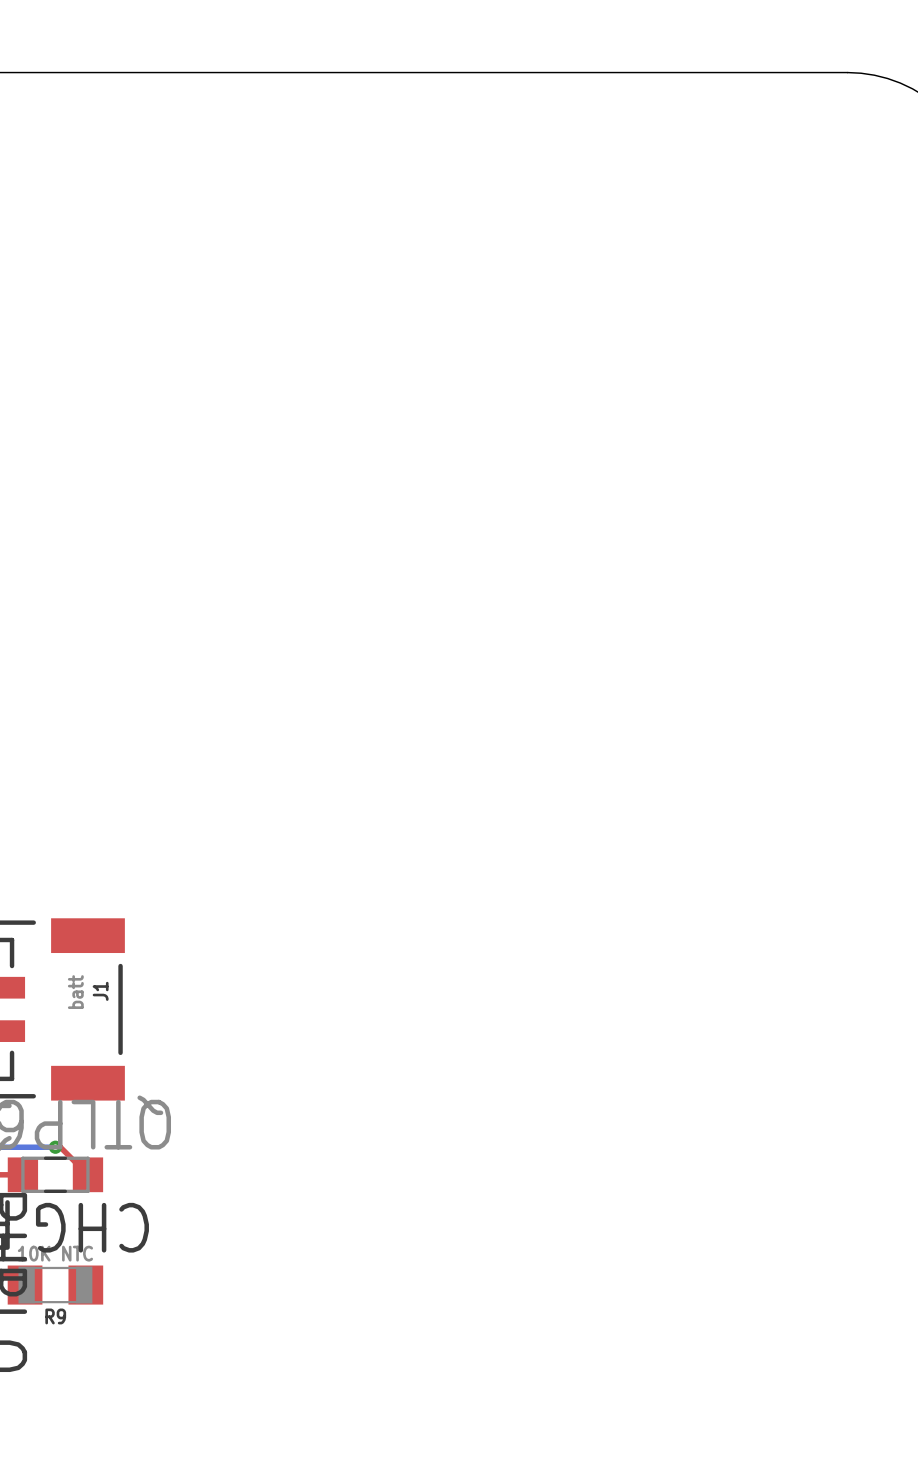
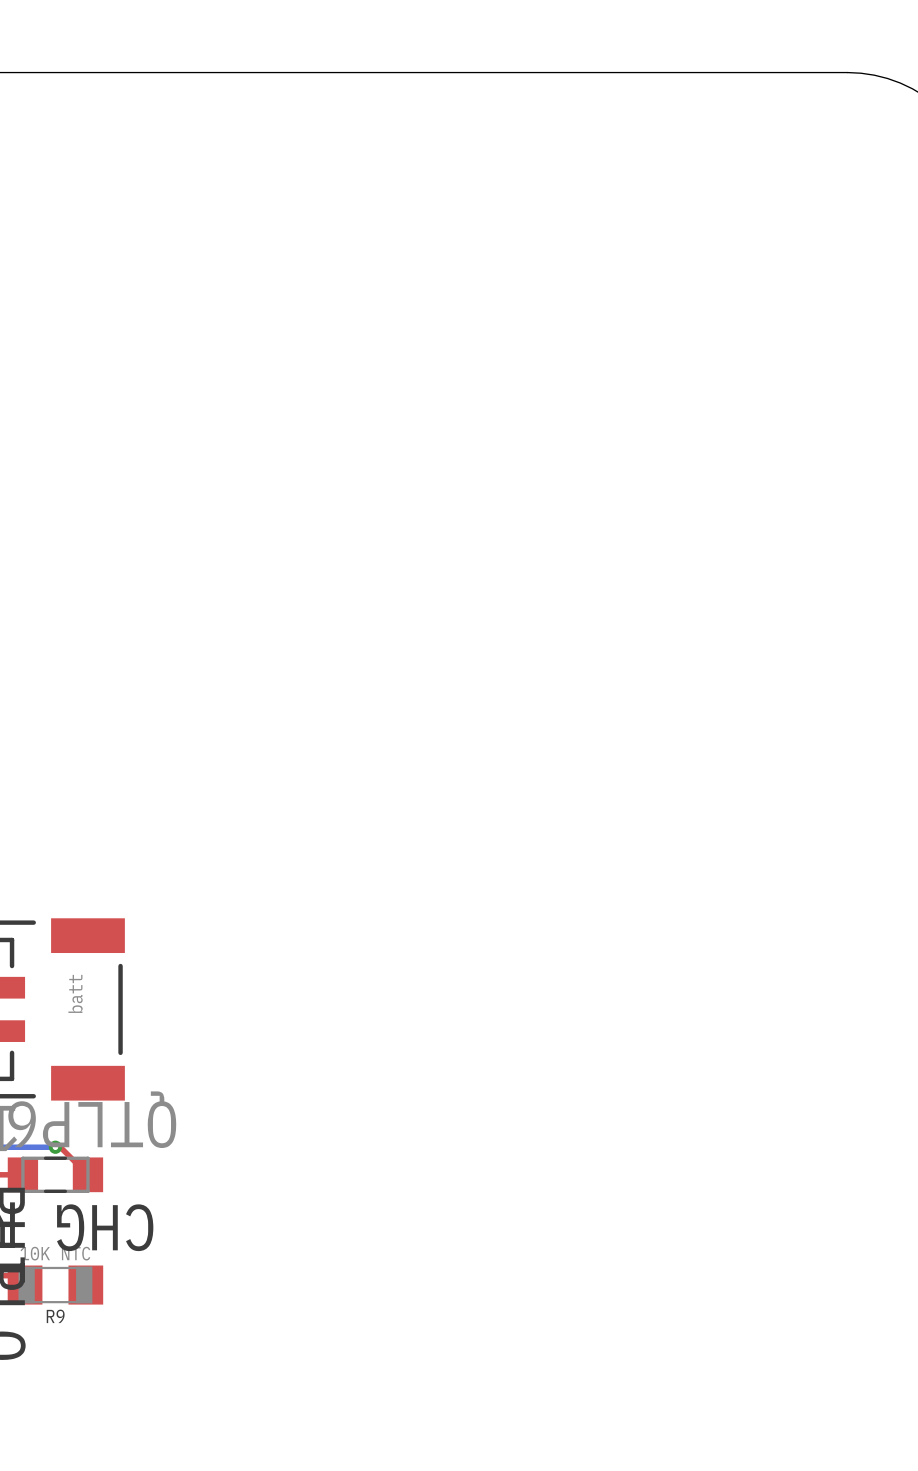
J1 name: J1 (100, 991) -> none

